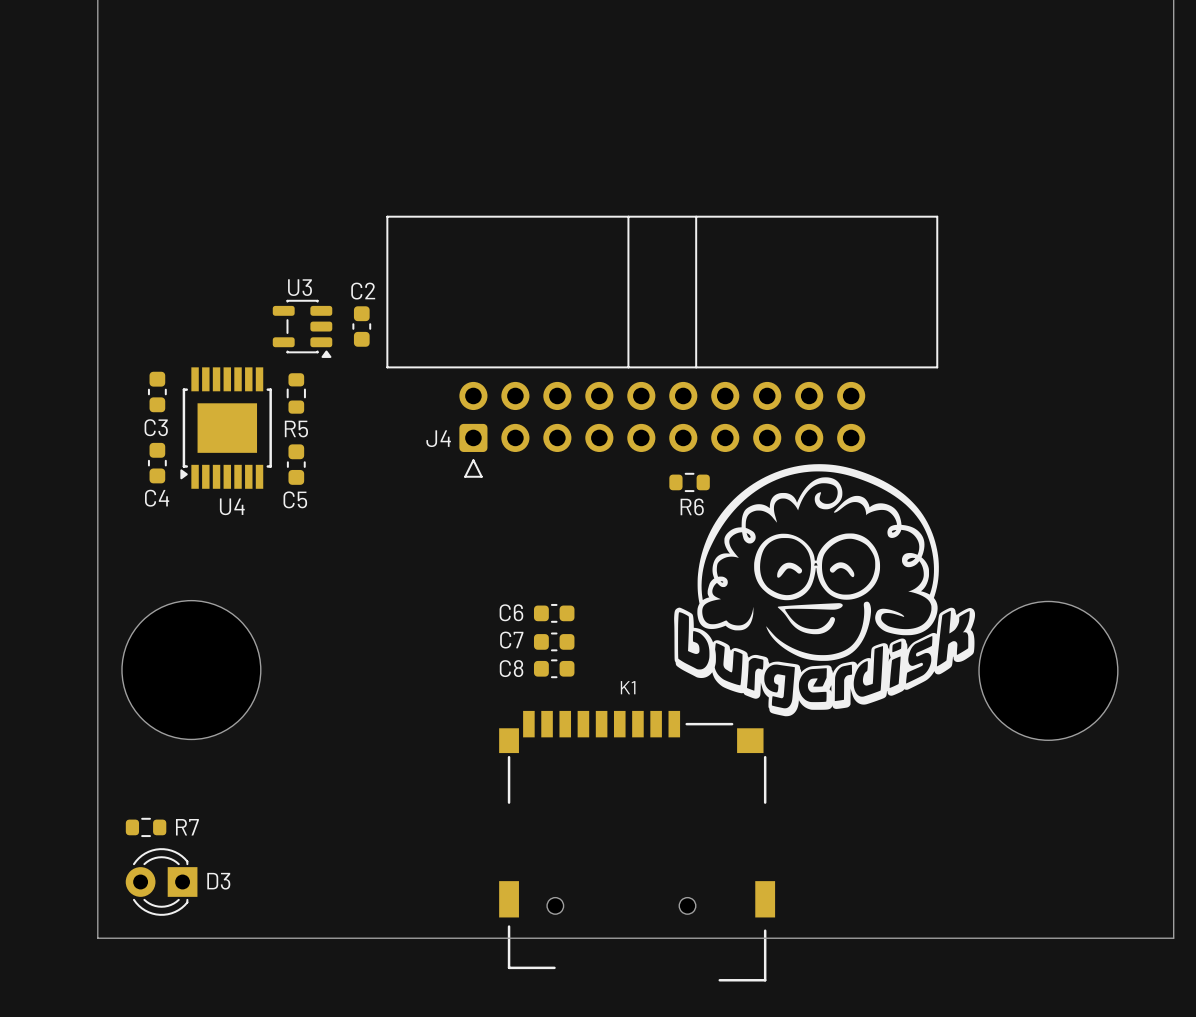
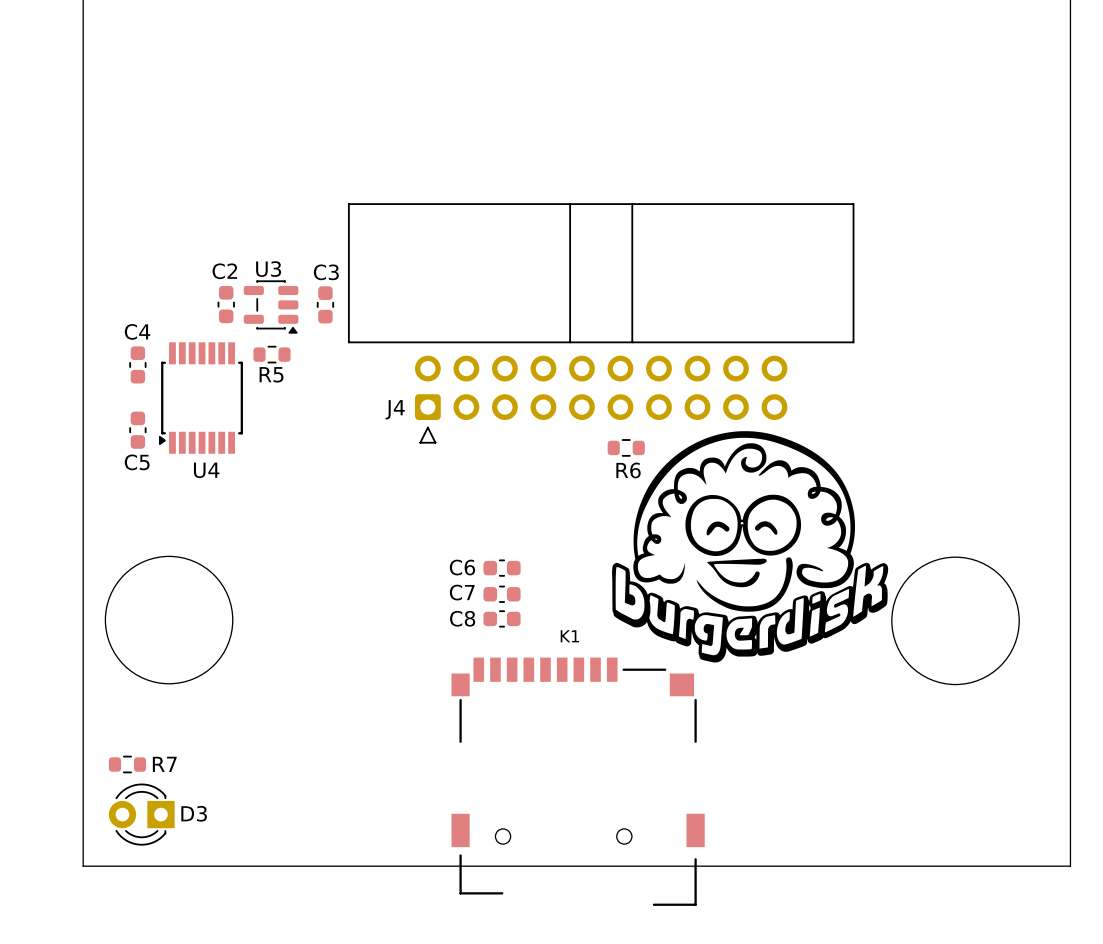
C2 name: C2 (363, 291) -> C3 (326, 272)
C2: none -> (226, 304)
U4 footprint: [180, 367, 272, 489] -> [158, 342, 243, 454]
R5 rotation: 0° (296, 393) -> 90° clockwise (272, 354)
C3 name: C3 (156, 427) -> C4 (137, 331)
C5: (296, 464) -> none
C4 name: C4 (157, 498) -> C5 (137, 462)

